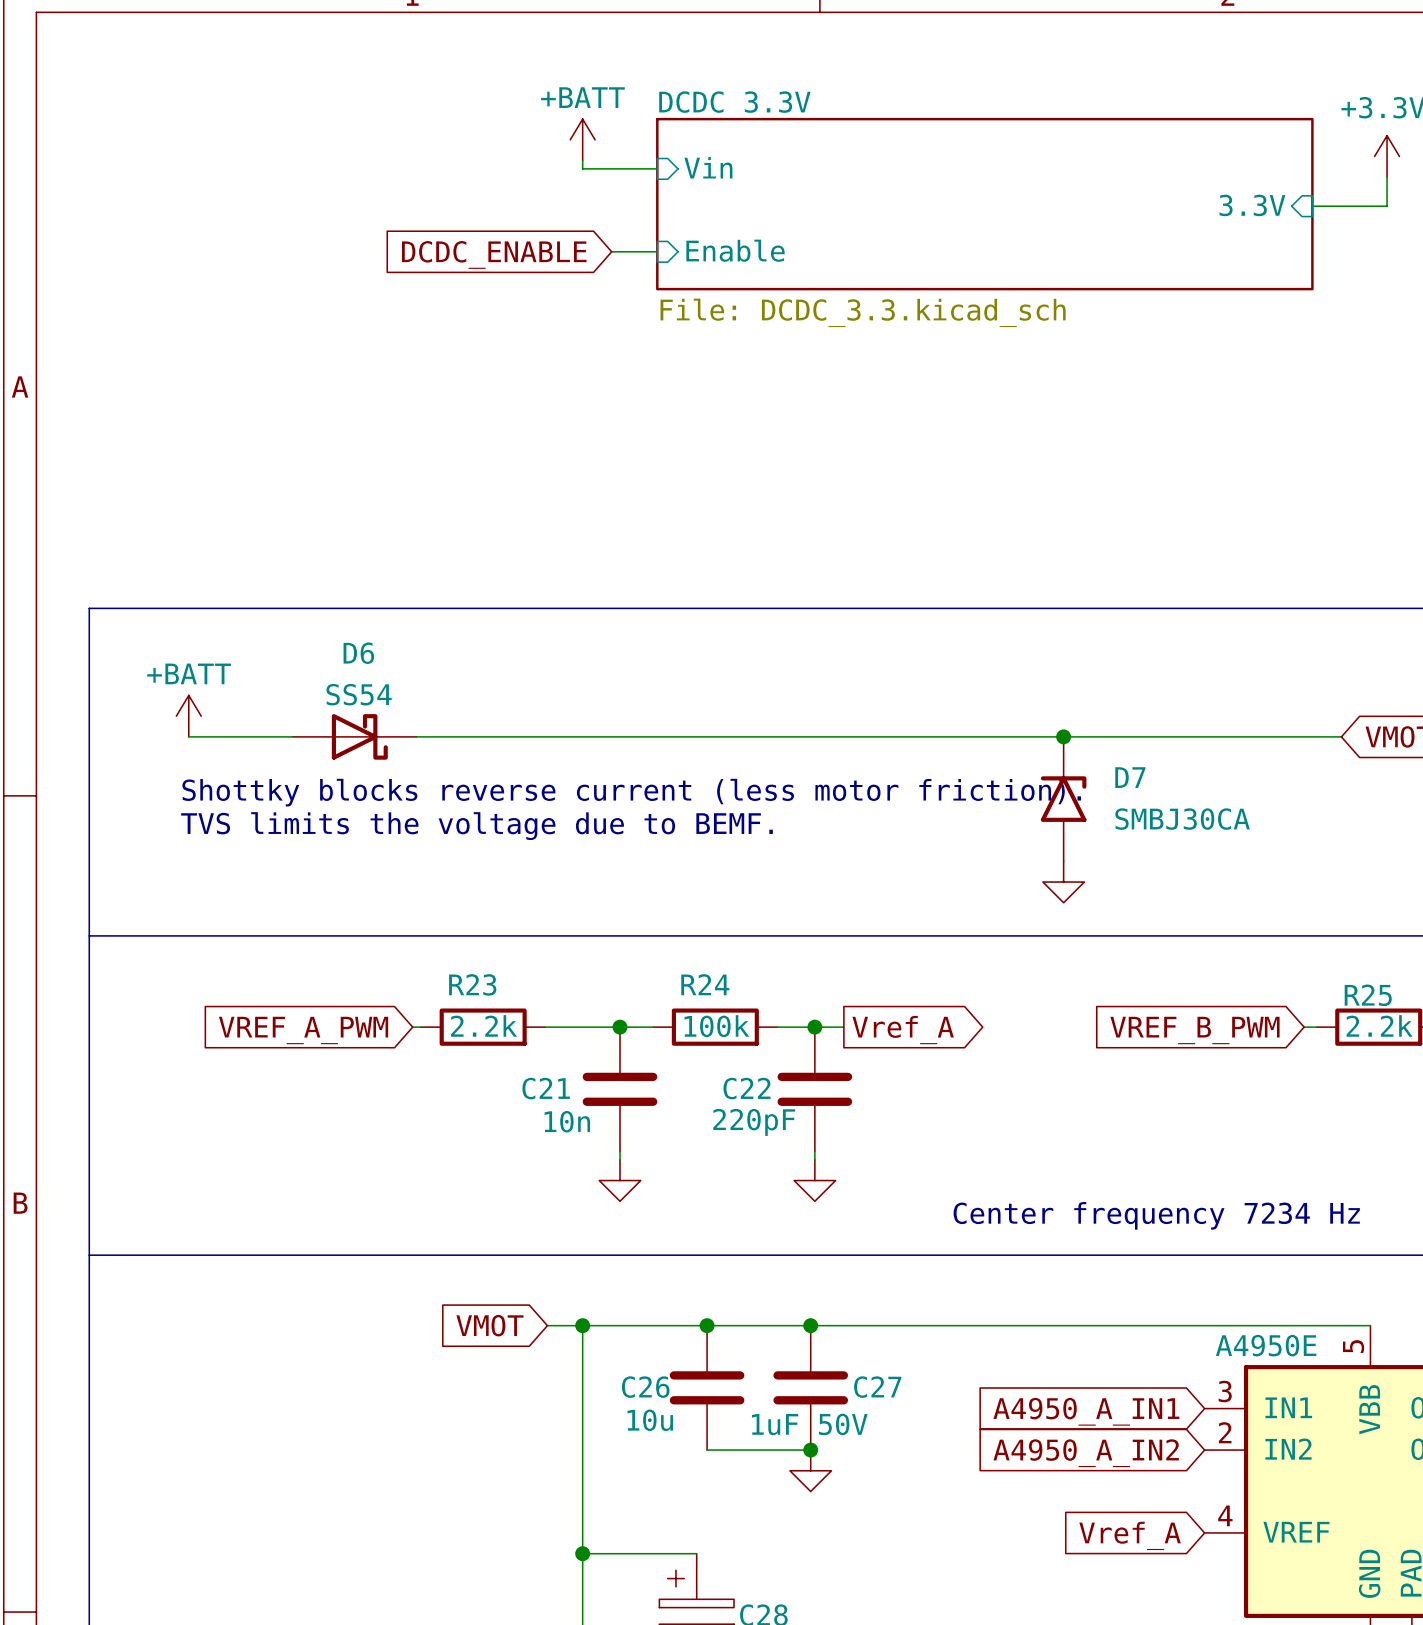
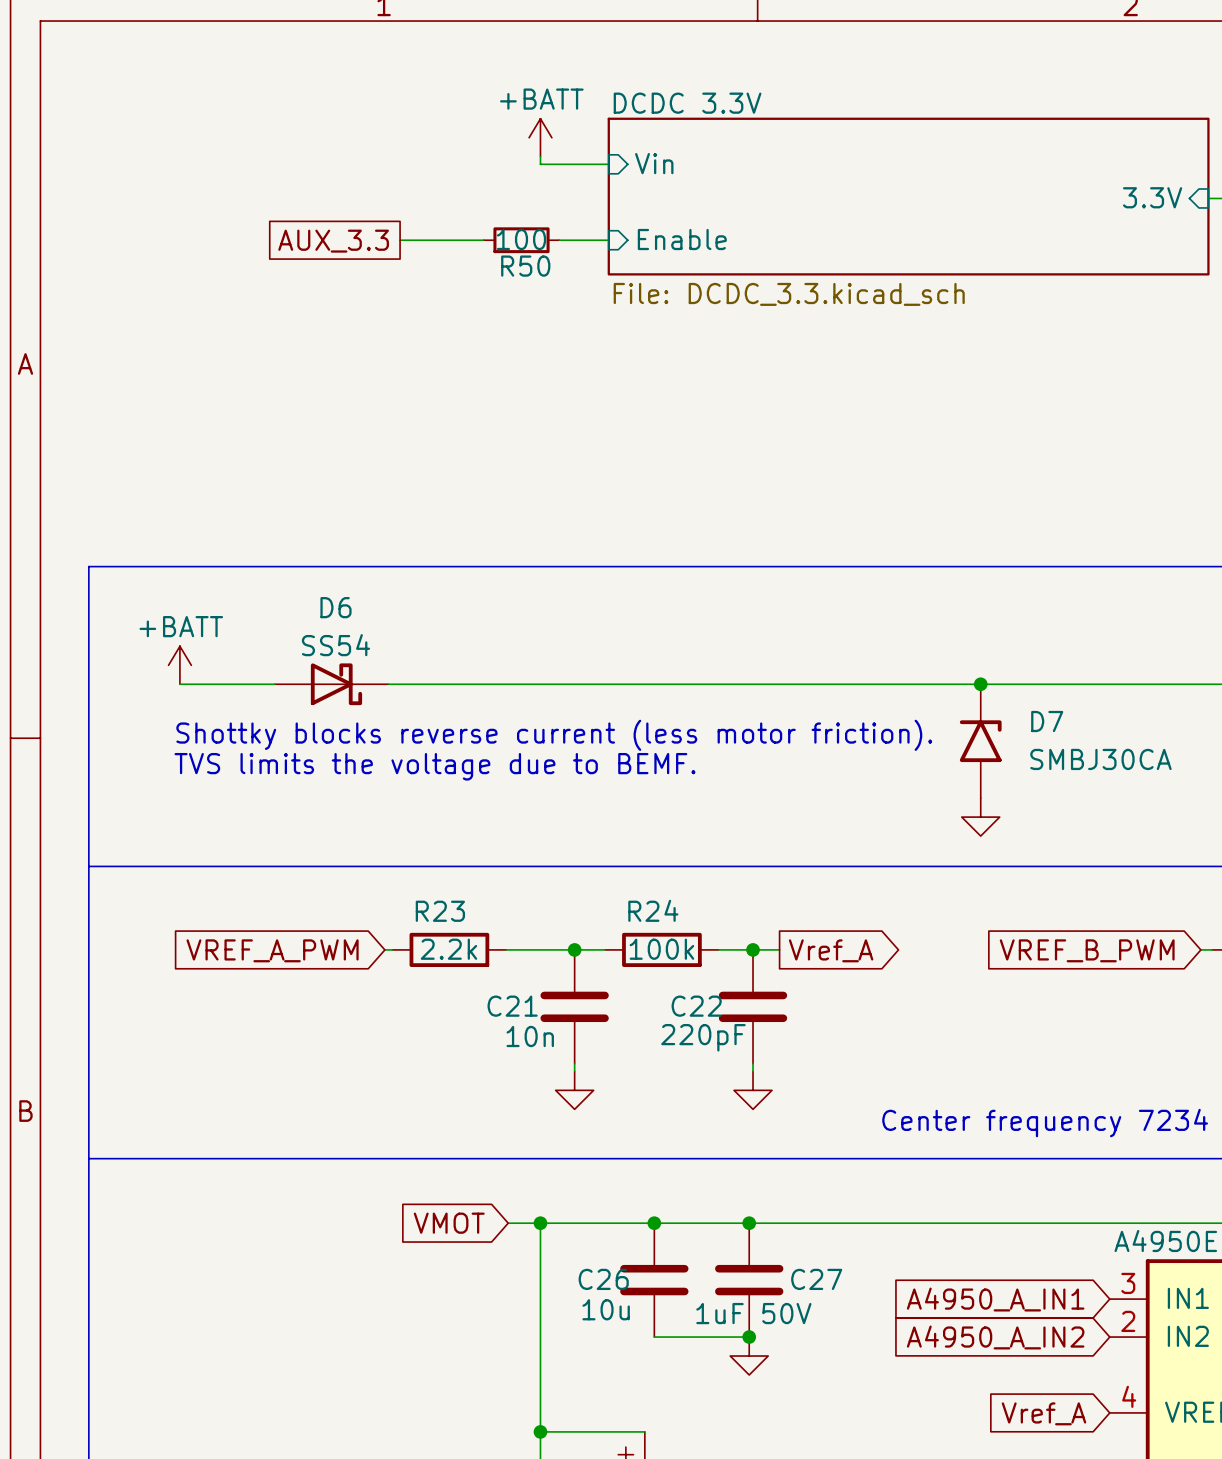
wire: none -> (400, 240) (483, 240)
R50: none -> 100 (521, 240)
wire: none -> (559, 240) (567, 240)
global label: none -> AUX_3.3 (333, 241)
global label: DCDC_ENABLE (494, 254) -> none

